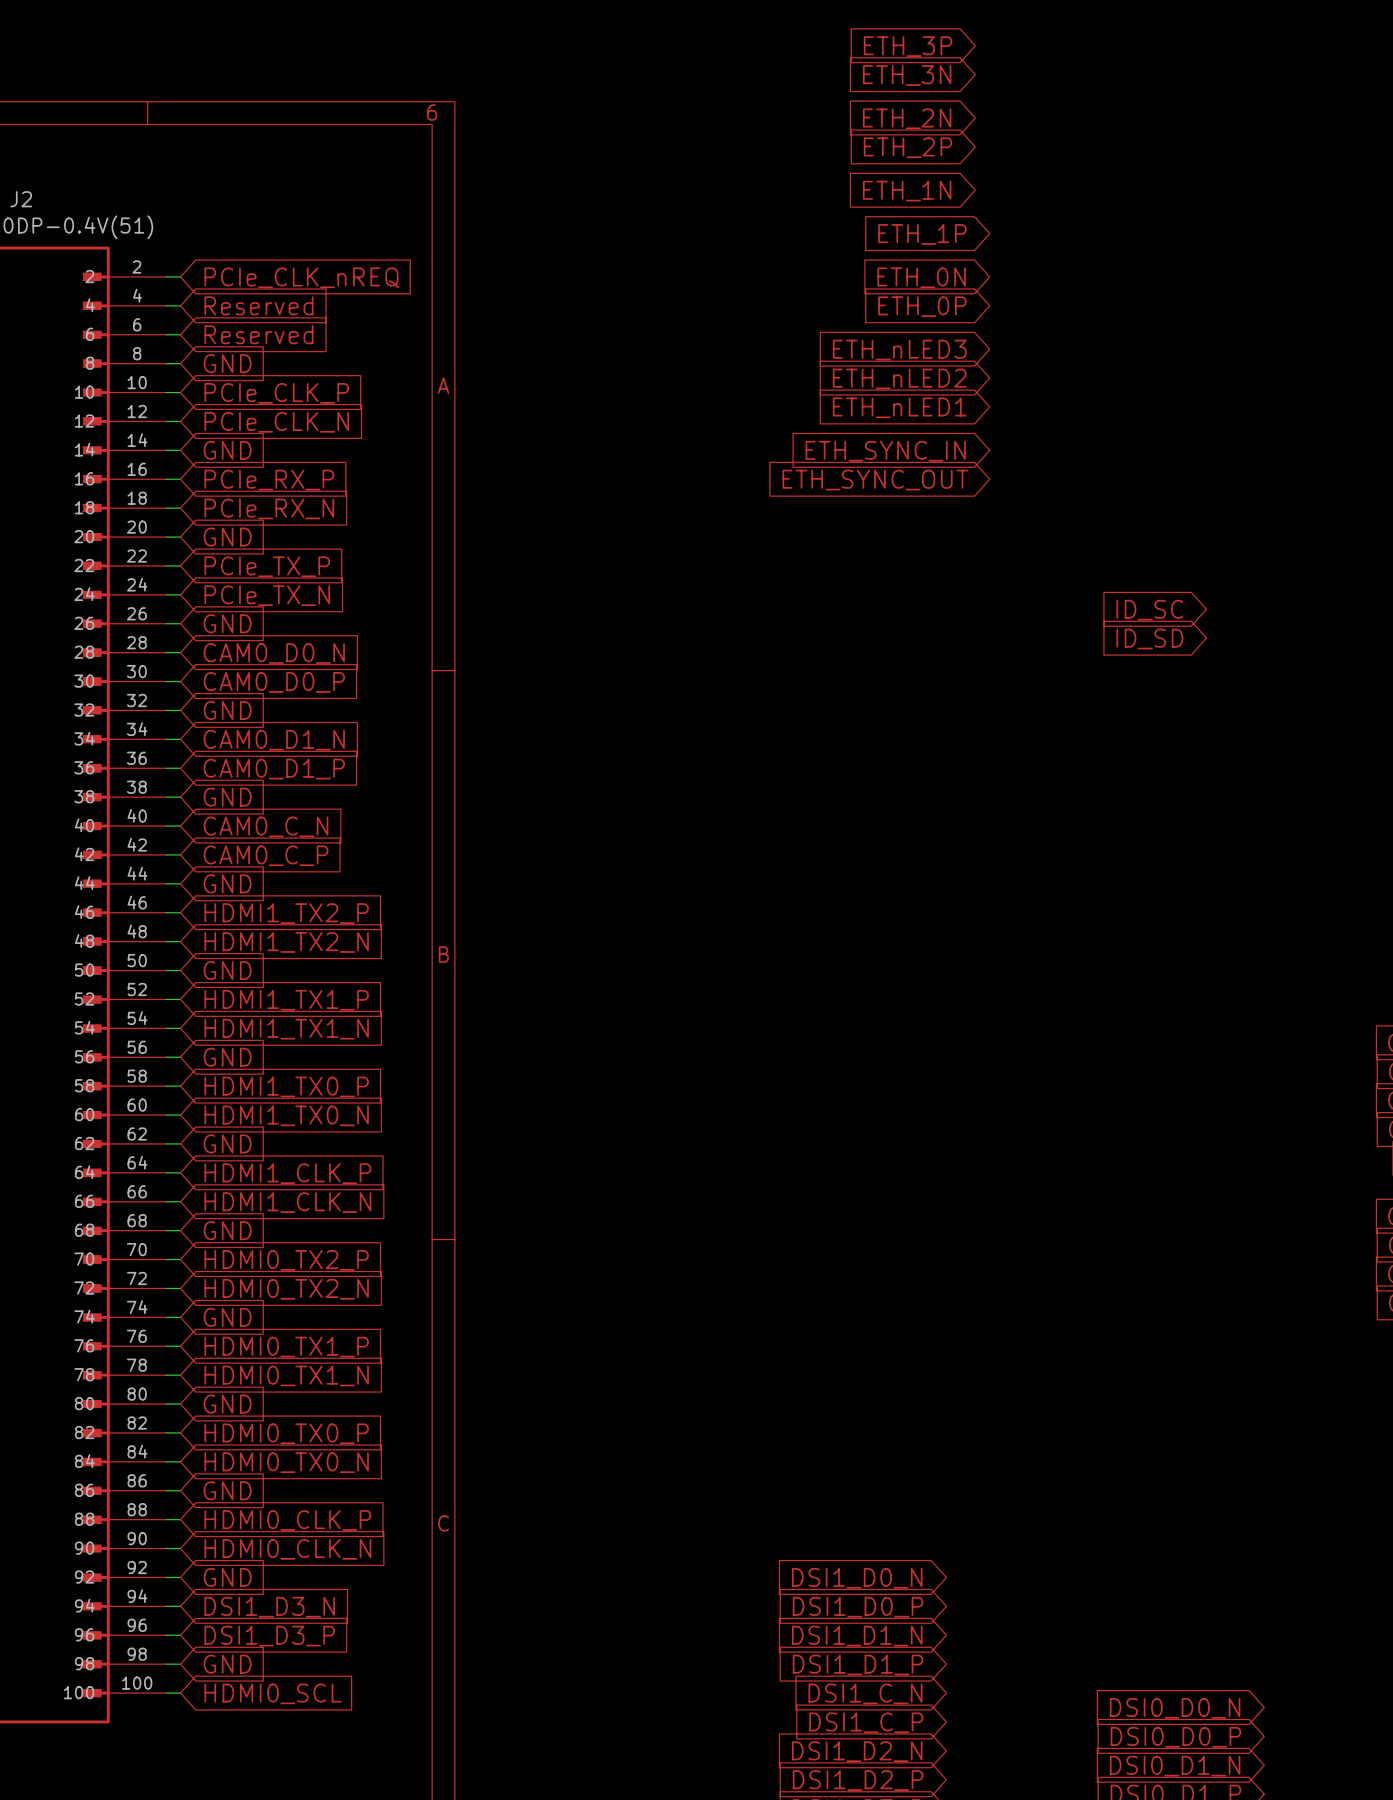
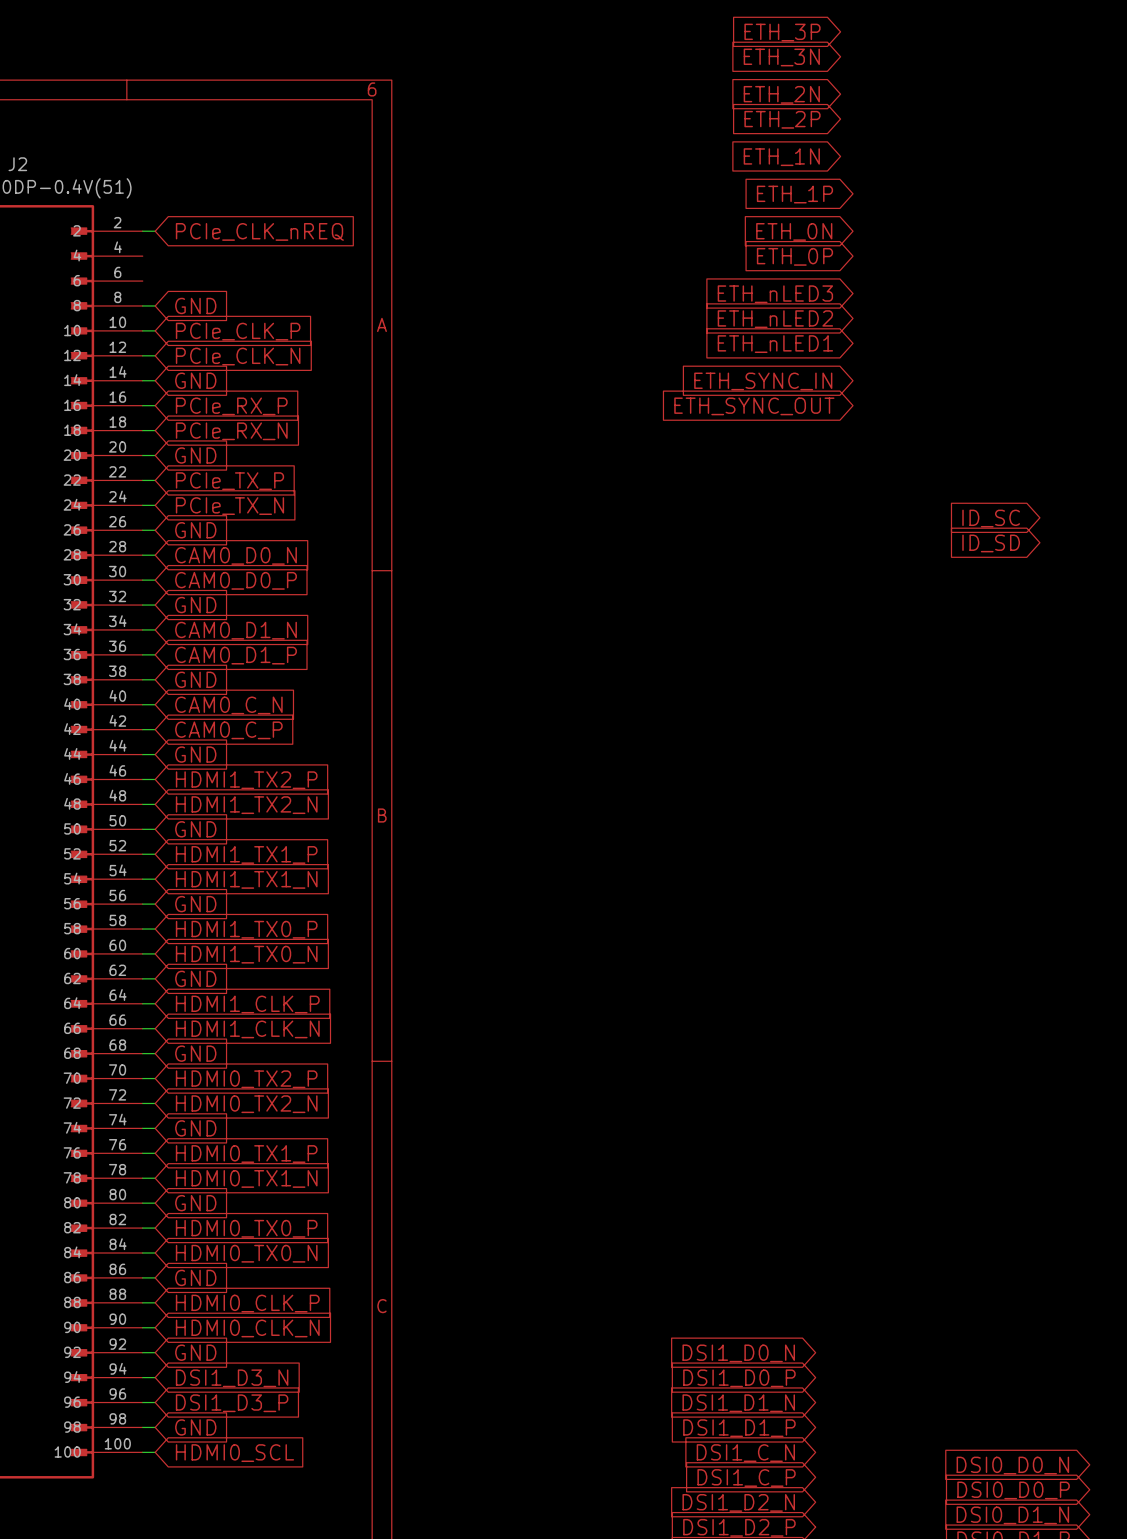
wire: (166, 305) (180, 305) -> none
global label: Reserved (258, 305) -> none
wire: (166, 334) (180, 334) -> none
global label: Reserved (258, 334) -> none

